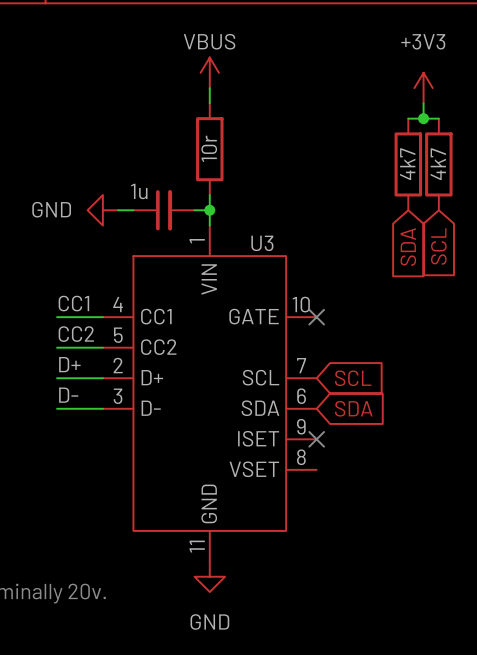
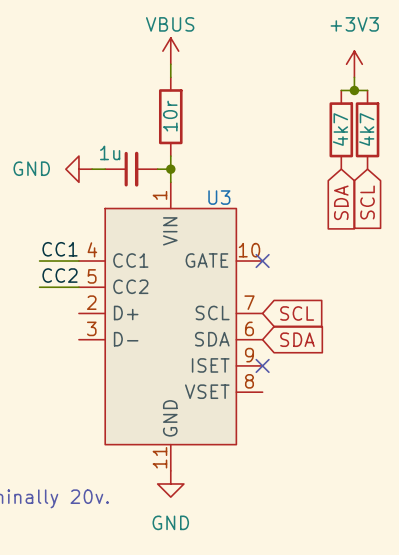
label: D+ (69, 364) -> none
wire: (57, 378) (102, 378) -> none
label: D- (68, 395) -> none
wire: (57, 408) (102, 408) -> none

